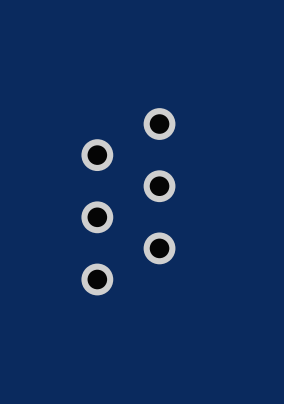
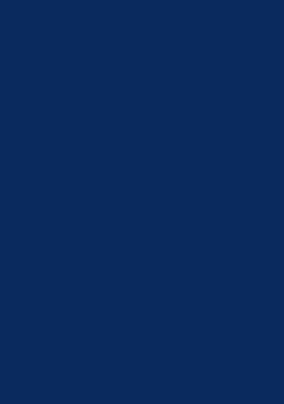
part: (128, 201) -> none

